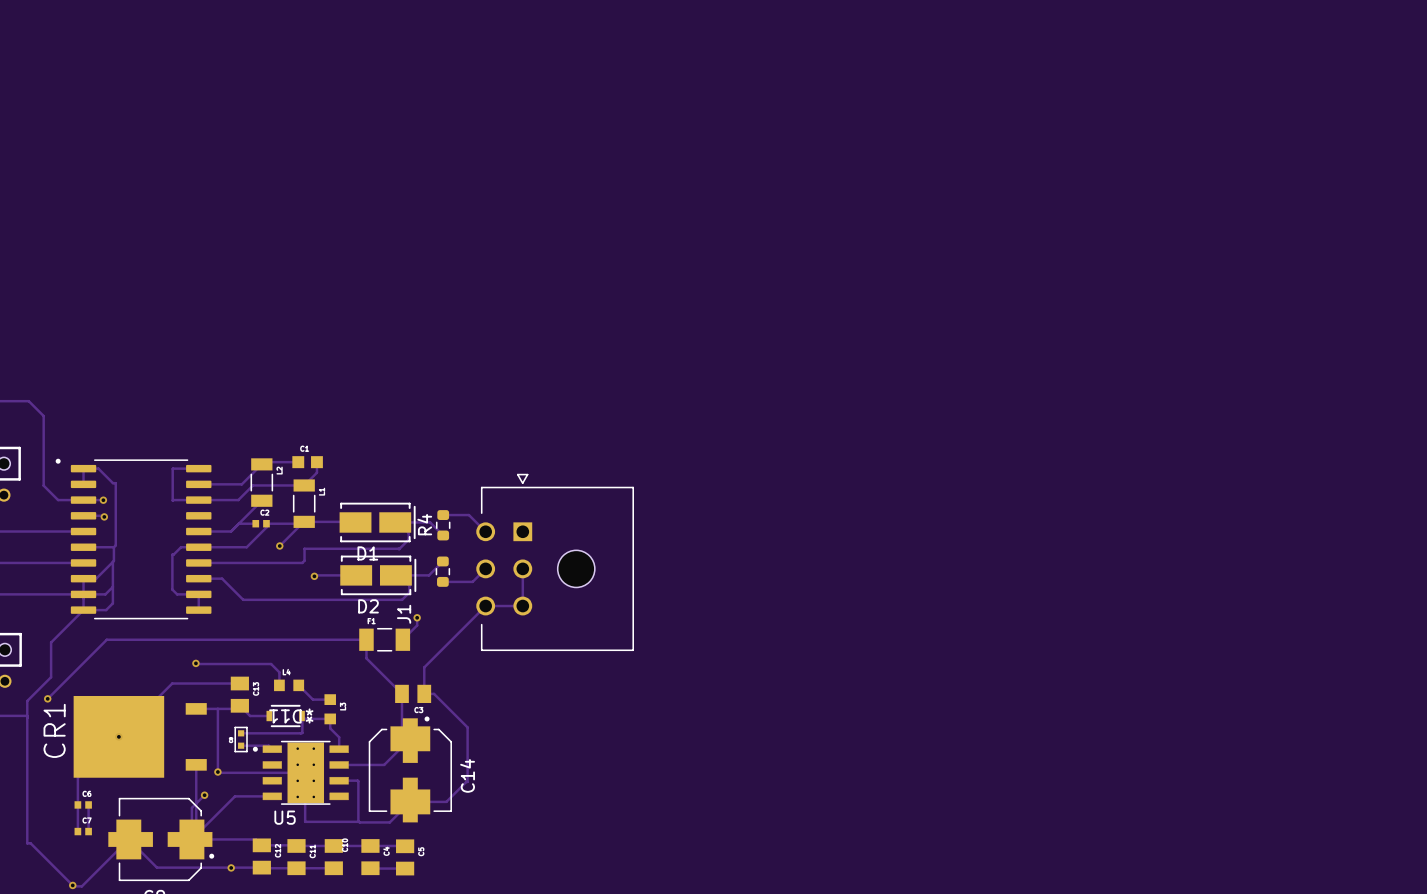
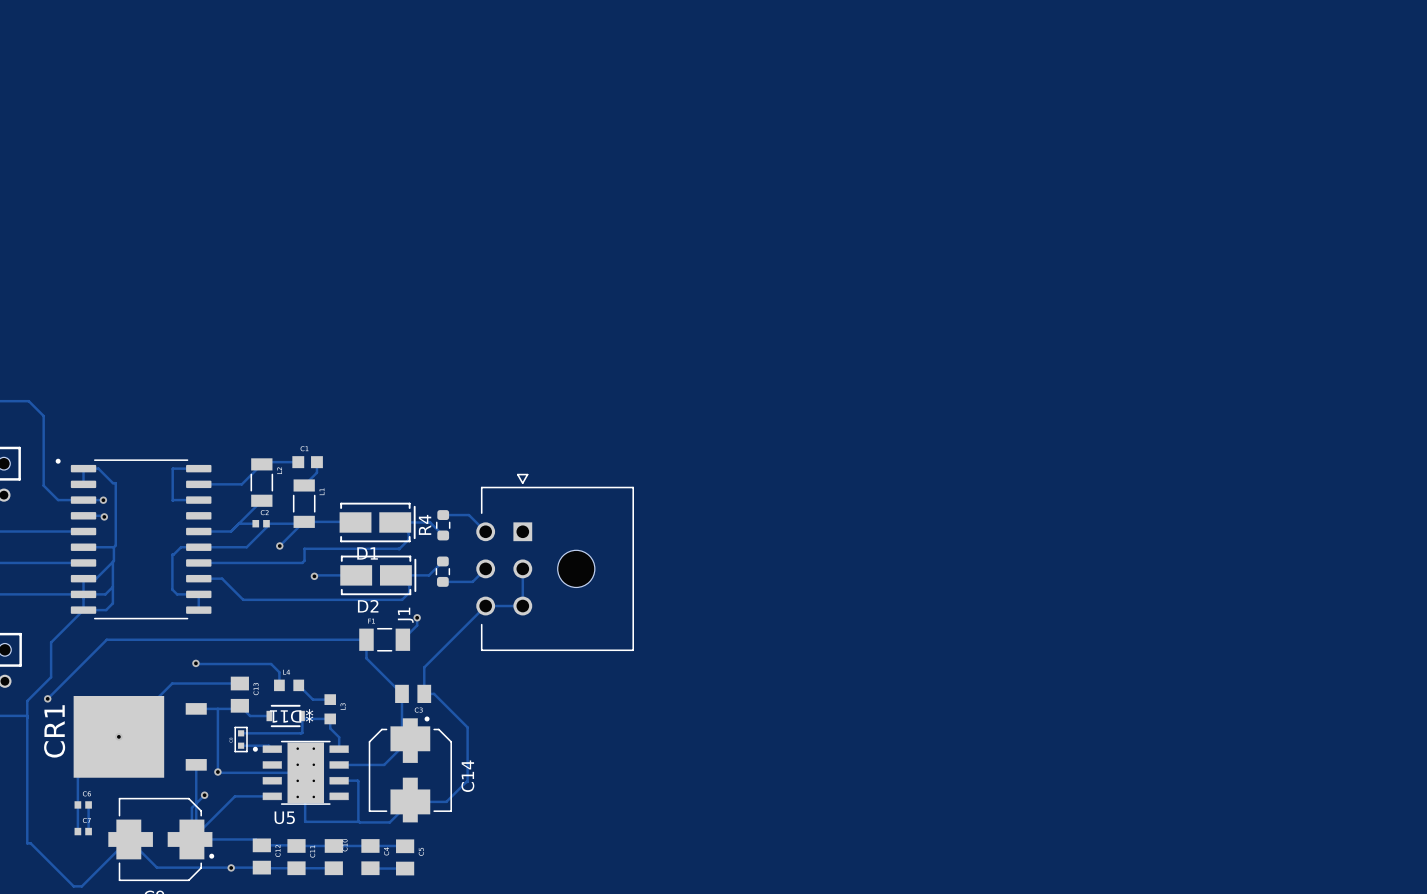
track: (304, 485) (252, 485) (238, 500) (198, 500) -> none
via: (72, 885) -> none

